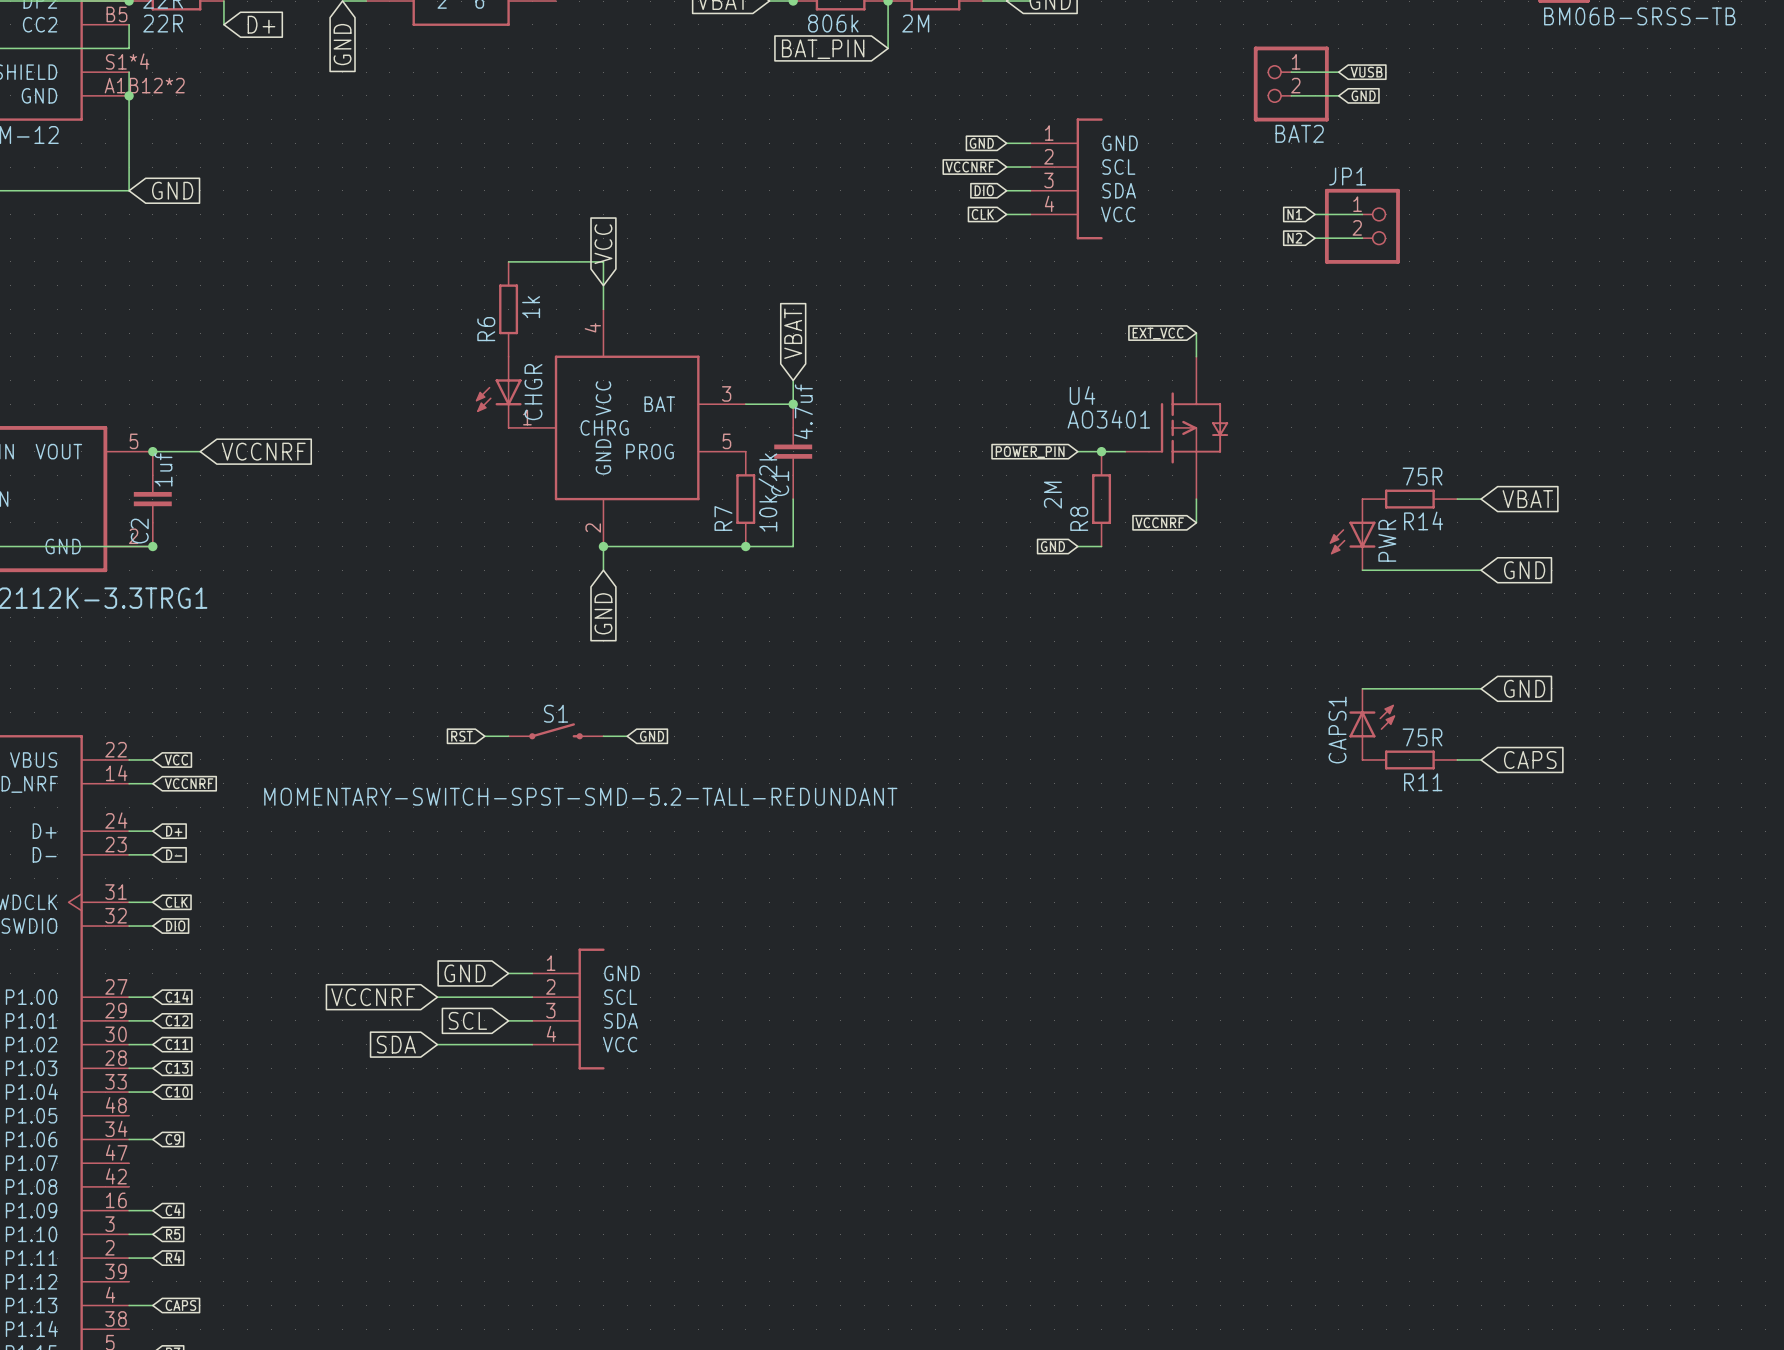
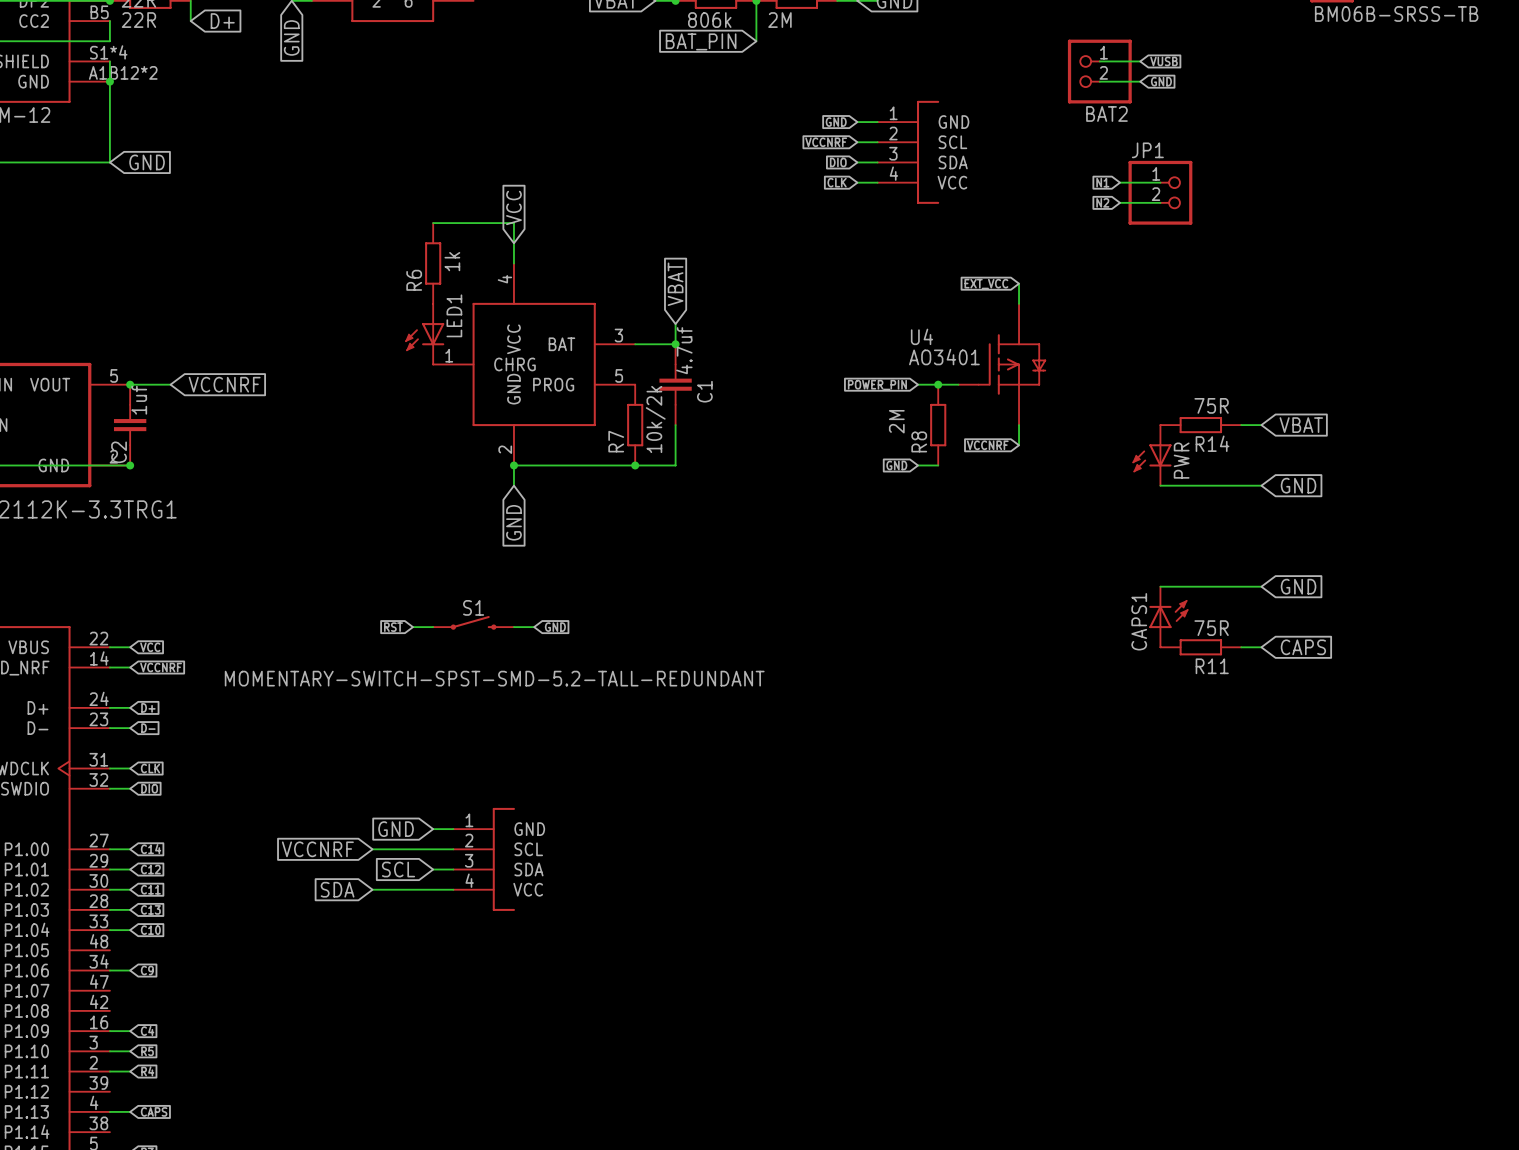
CHGR name: CHGR (533, 392) -> LED1 (454, 315)
C1 name position: C1 (780, 483) -> C1 (704, 391)

